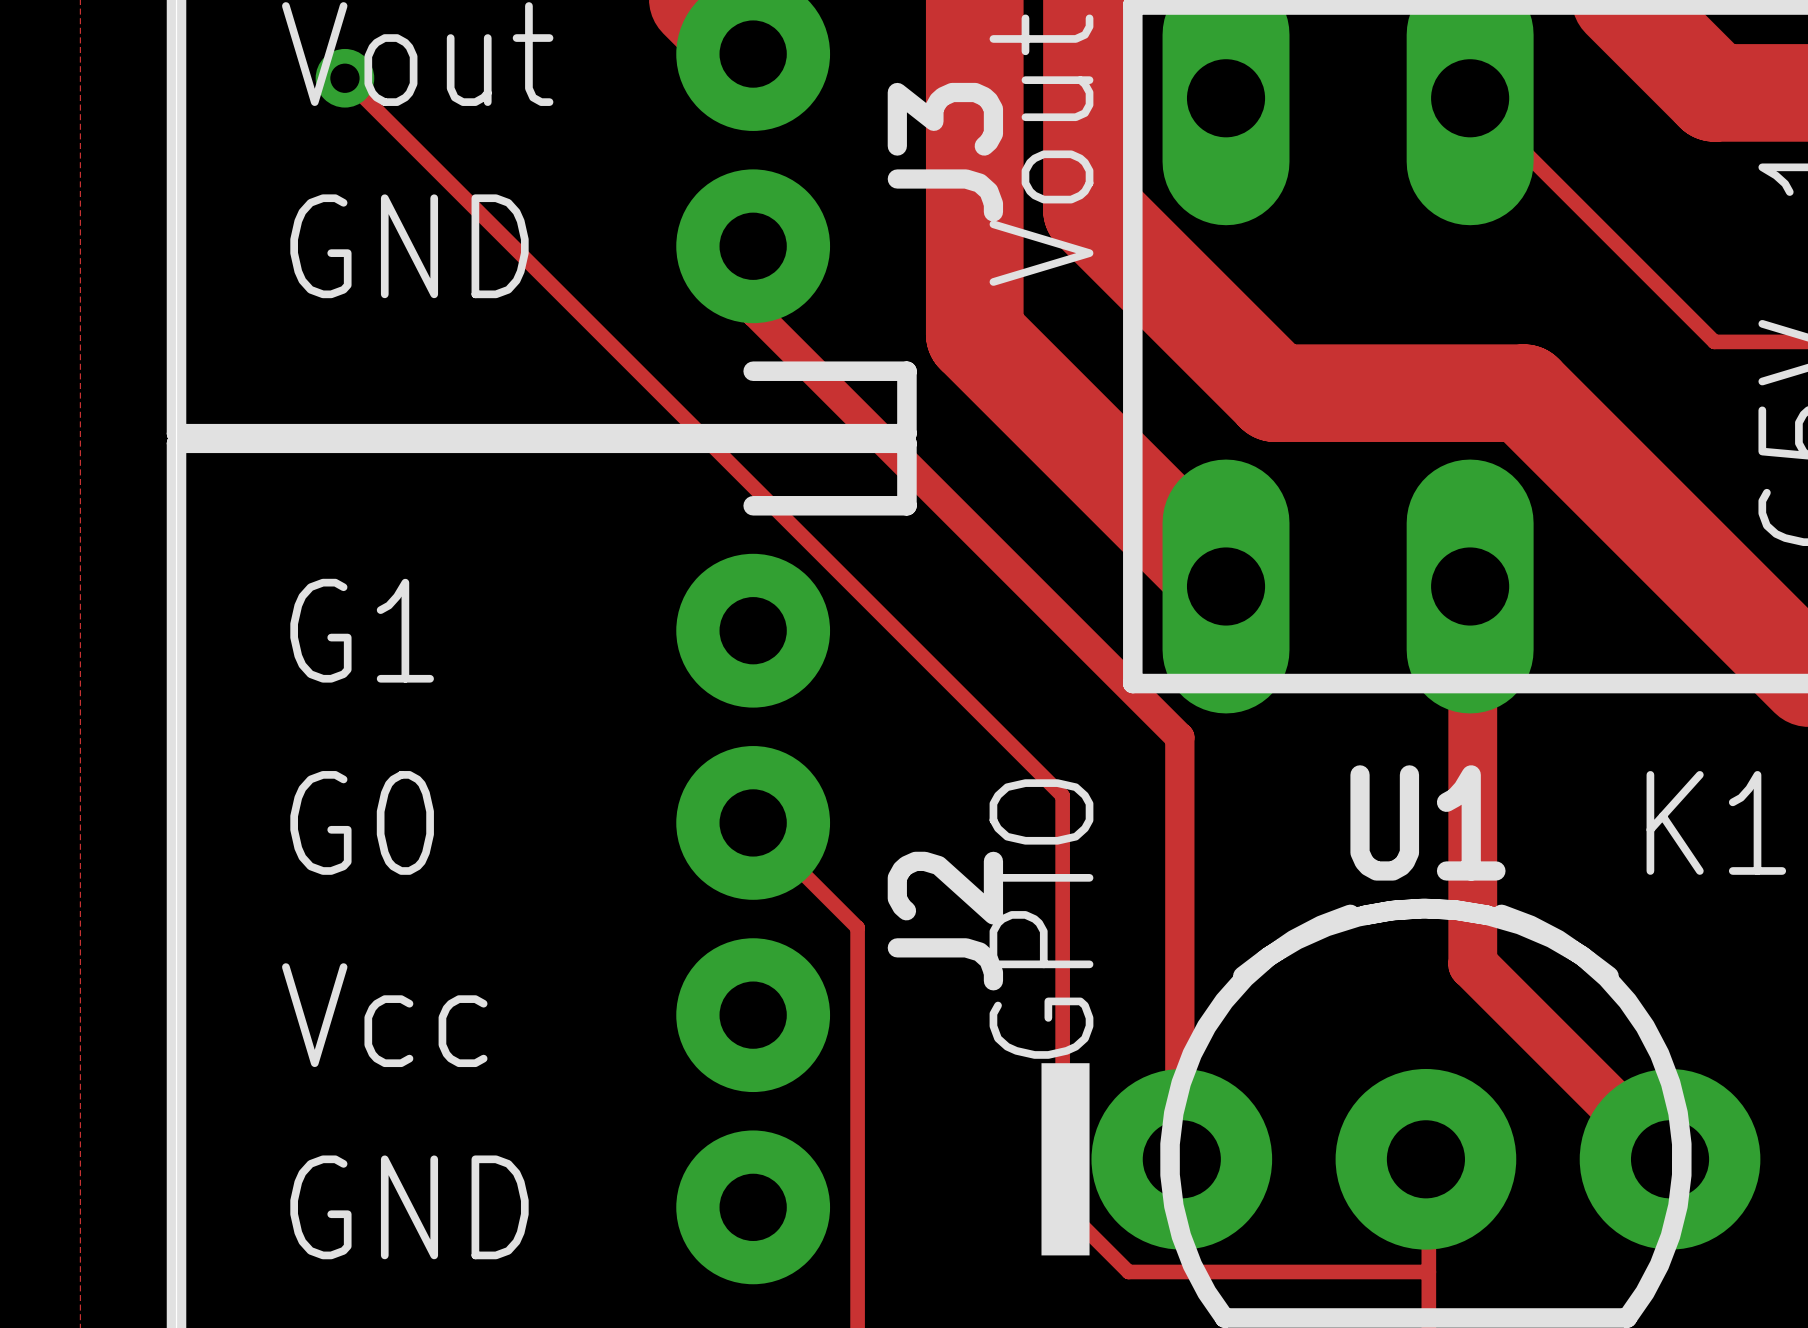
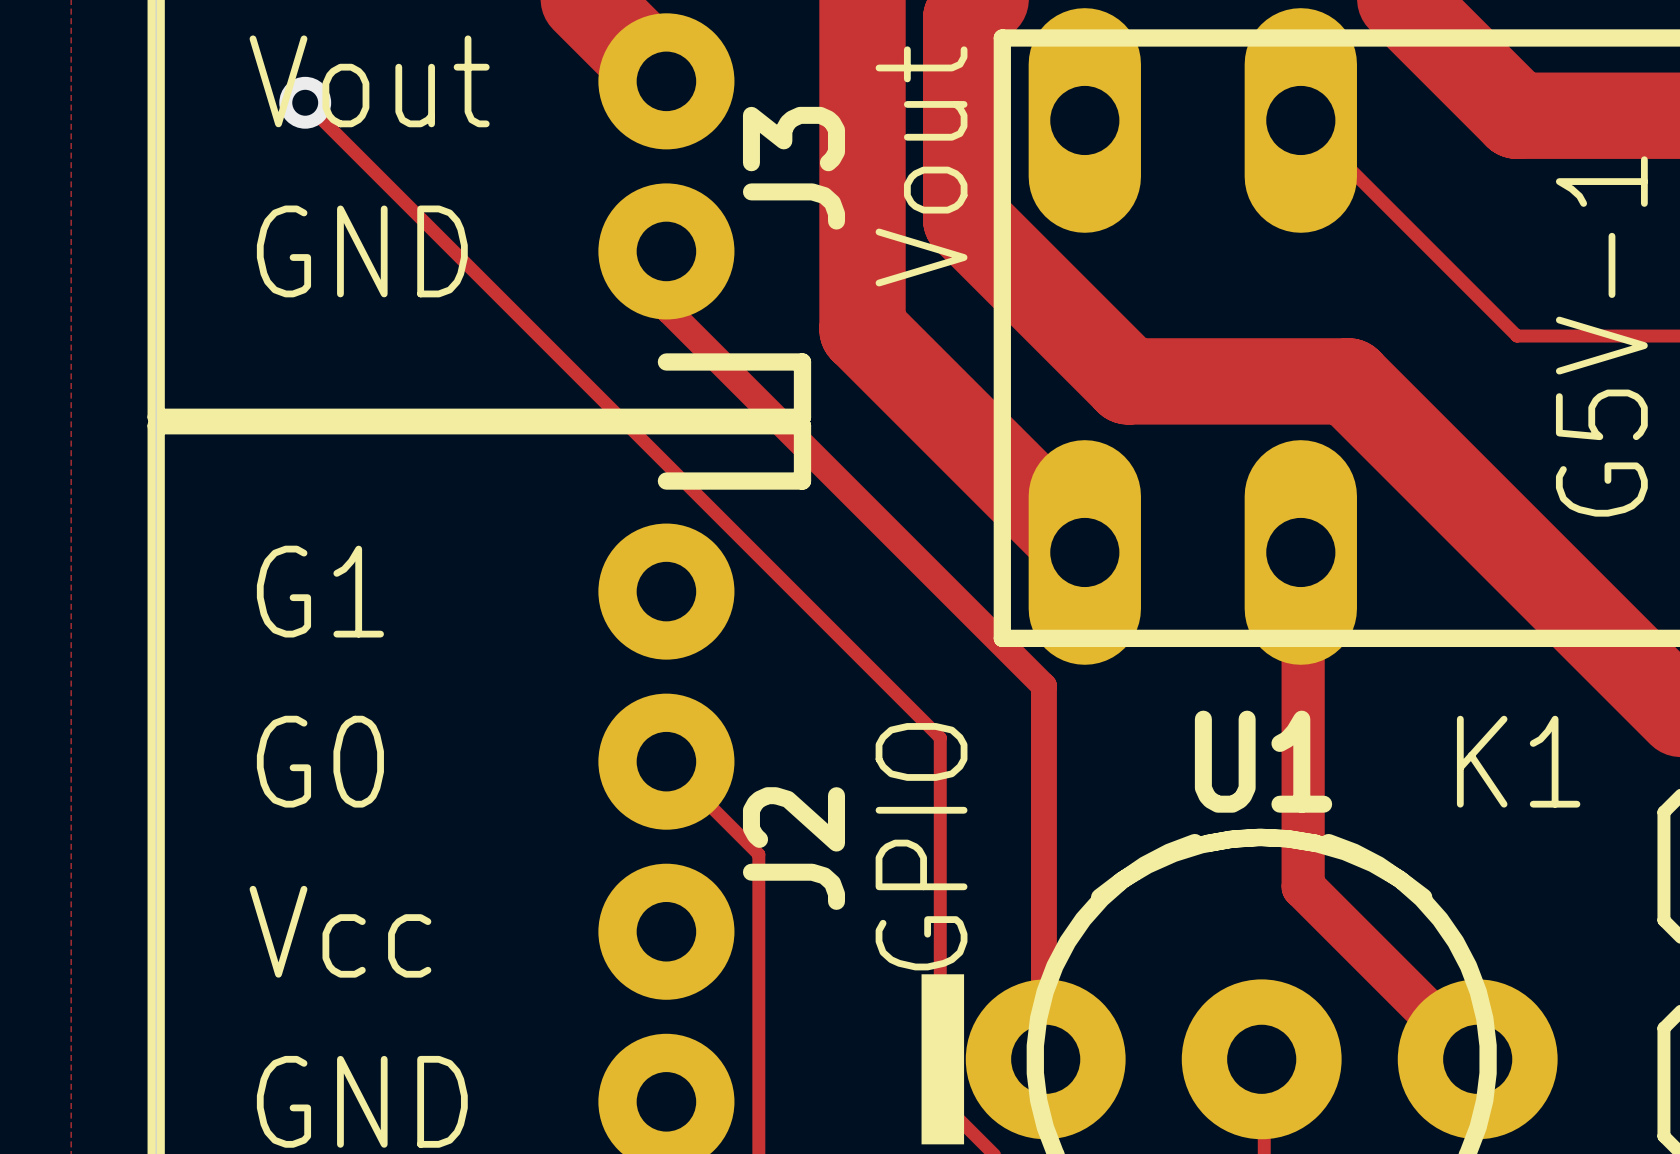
J3 name position: J3 (945, 152) -> J3 (793, 168)
J2 name position: J2 (945, 921) -> J2 (793, 848)

